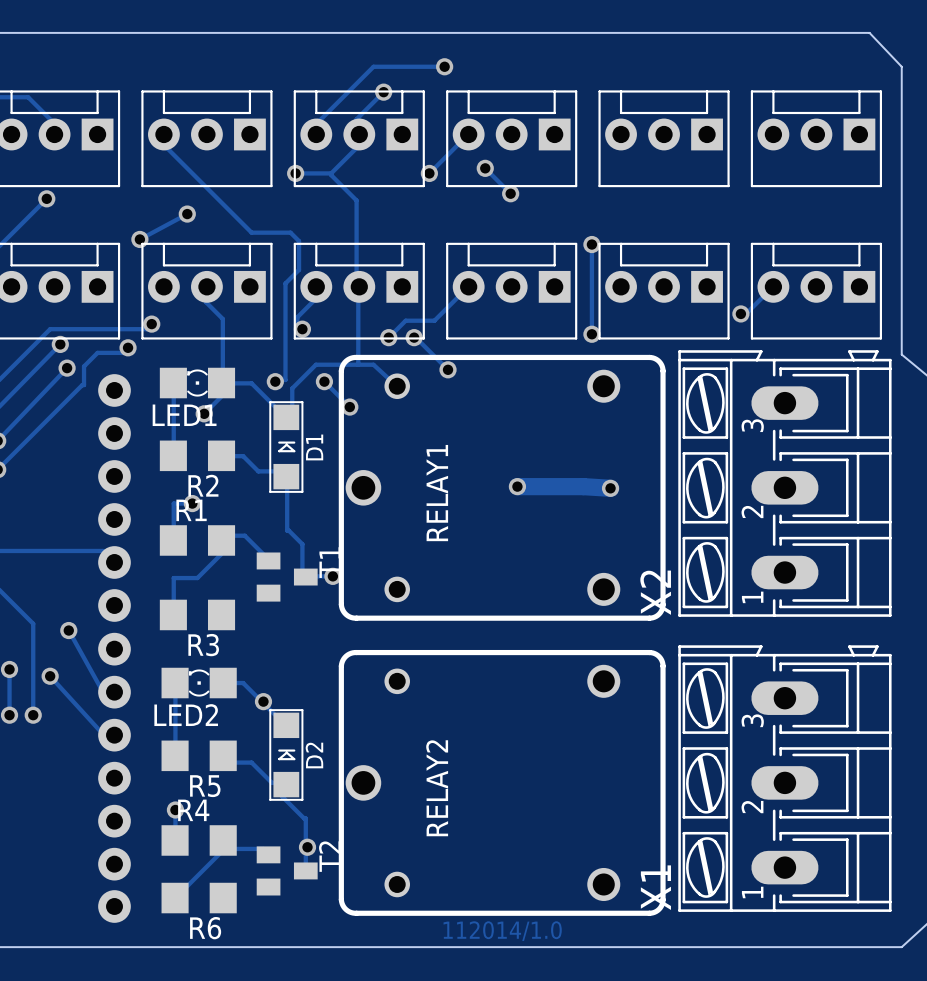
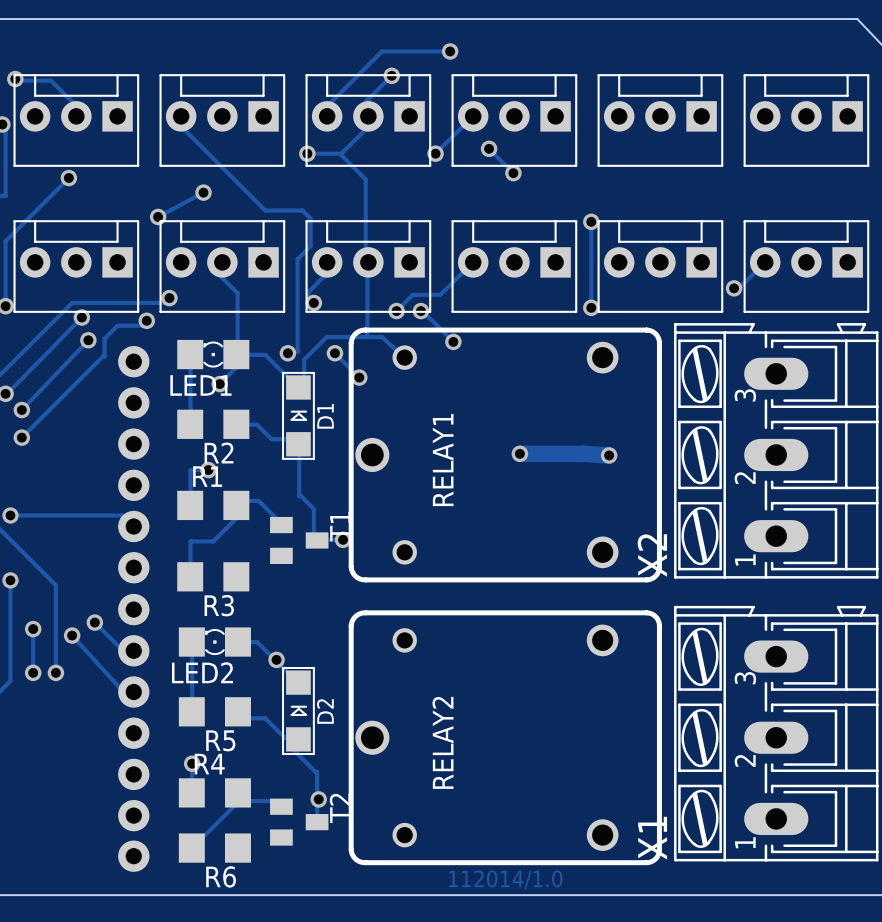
track: (68, 630) (102, 691) -> (94, 622) (122, 650)
via position: (68, 630) -> (94, 622)

